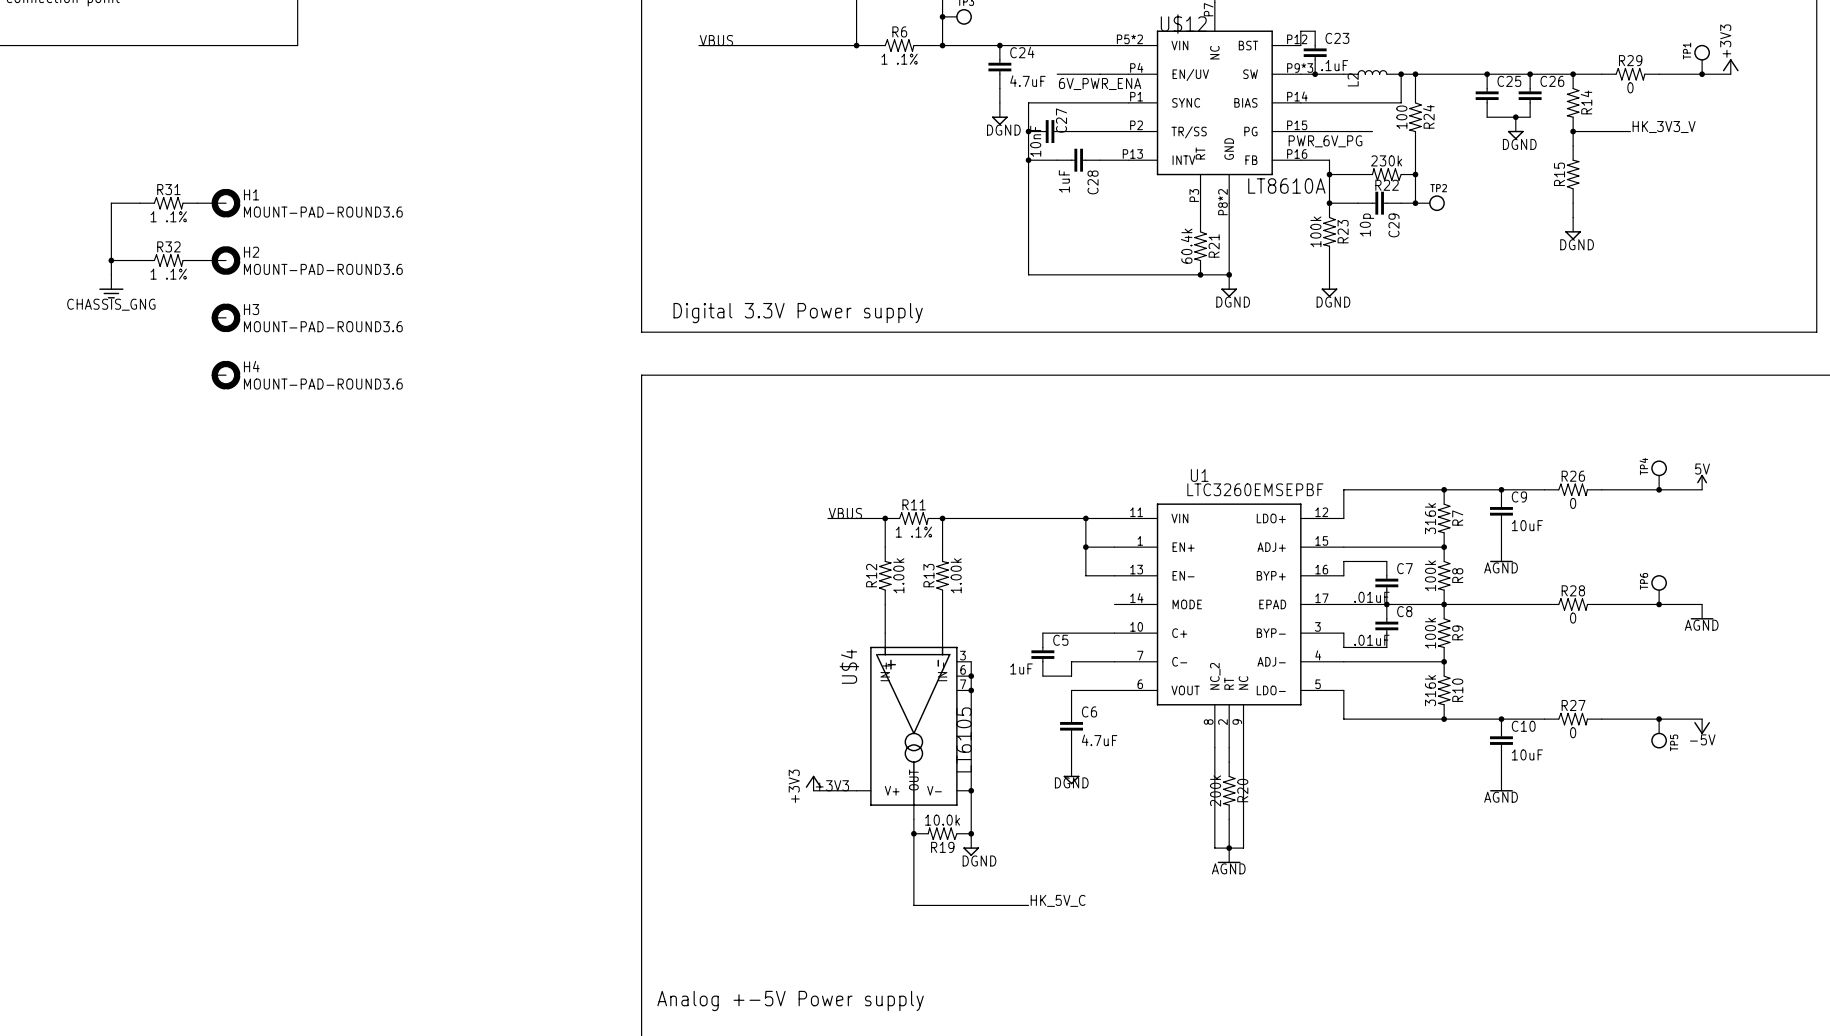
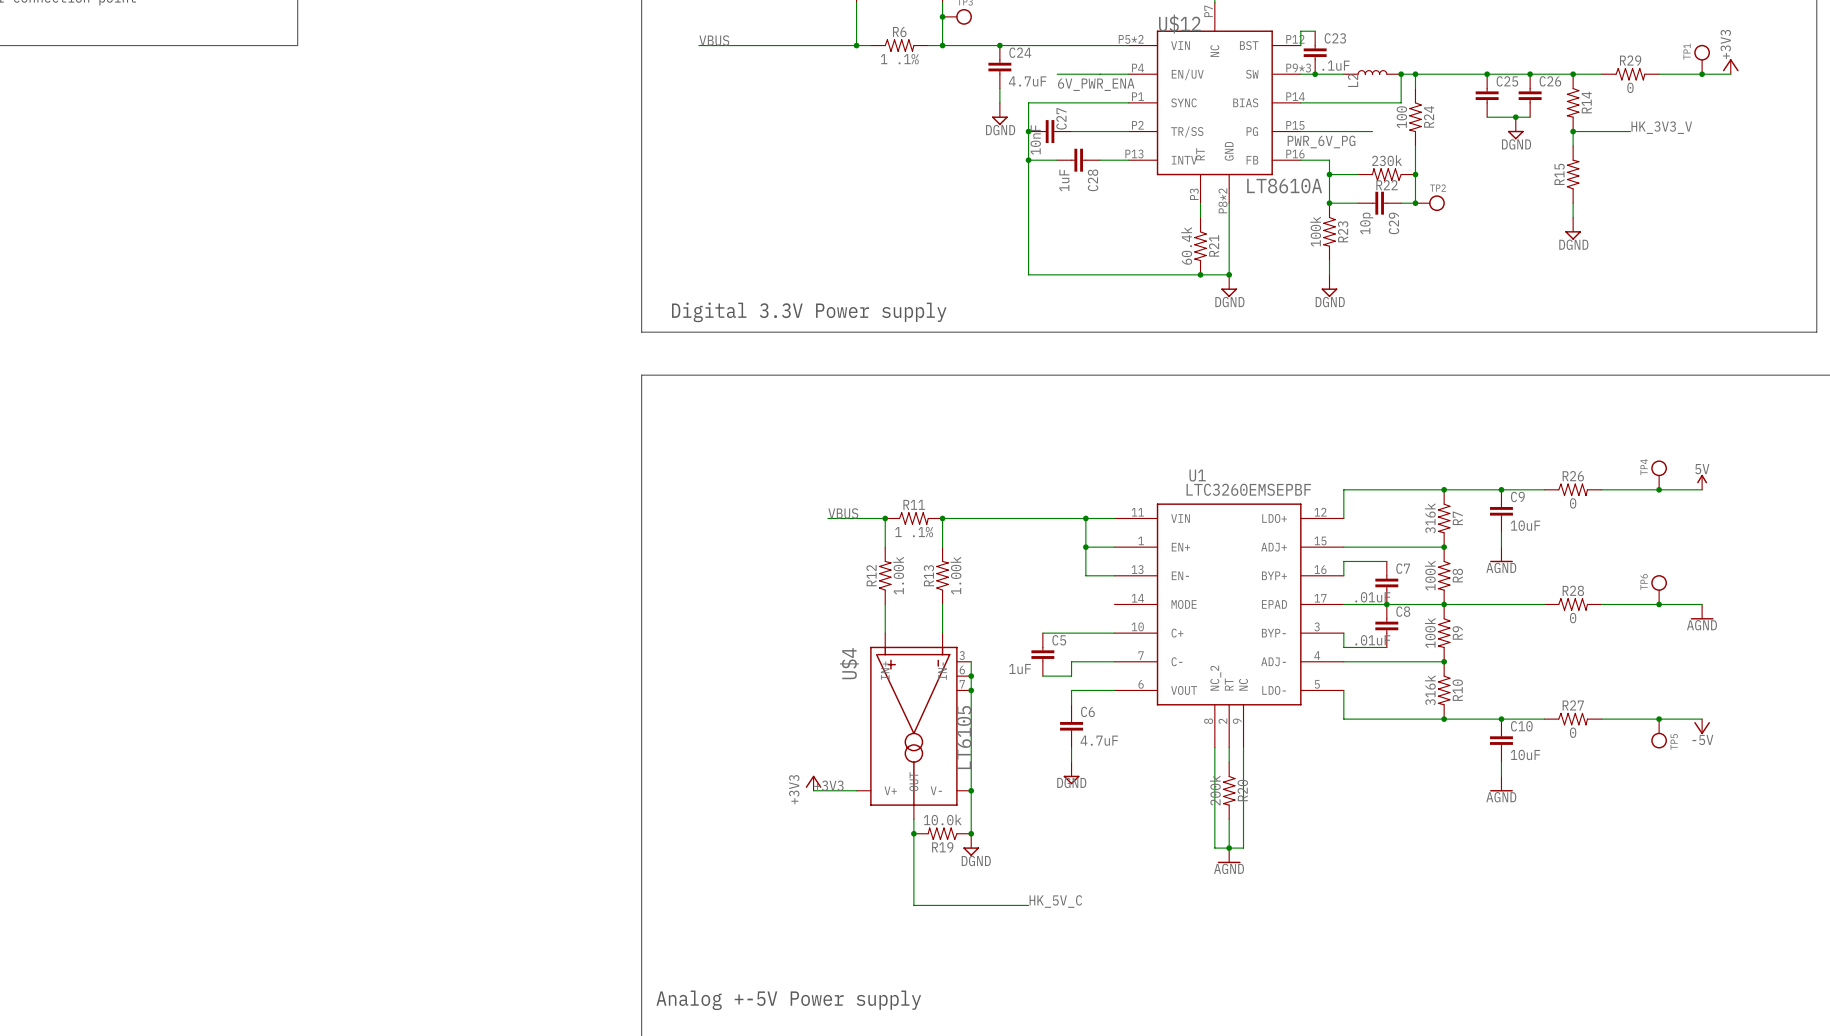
wire: (140, 203) (111, 203) (111, 274) -> none
R31: 1 .1% (168, 203) -> none
wire: (197, 203) (211, 203) -> none
H1: MOUNT-PAD-ROUND3.6 (226, 203) -> none
wire: (111, 260) (140, 260) -> none
junction: (111, 260) -> none
R32: 1 .1% (168, 260) -> none
wire: (197, 260) (211, 260) -> none
H2: MOUNT-PAD-ROUND3.6 (226, 260) -> none
power symbol: CHASSIS_GNG (111, 286) -> none
H3: MOUNT-PAD-ROUND3.6 (226, 317) -> none
H4: MOUNT-PAD-ROUND3.6 (226, 375) -> none

